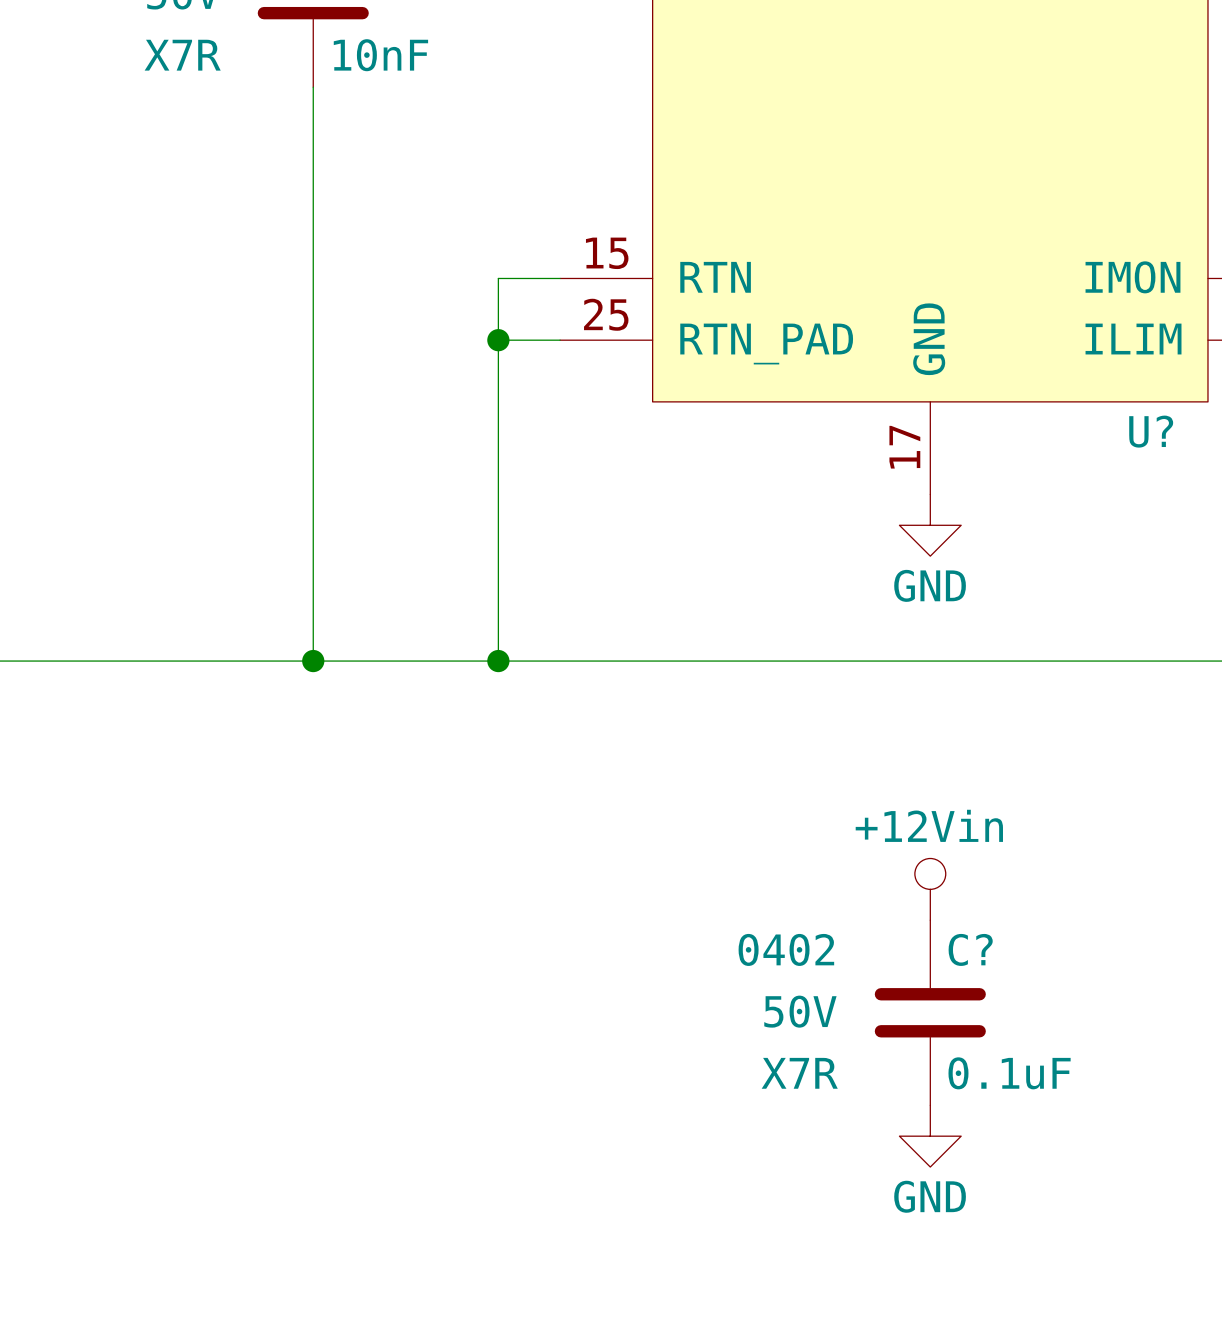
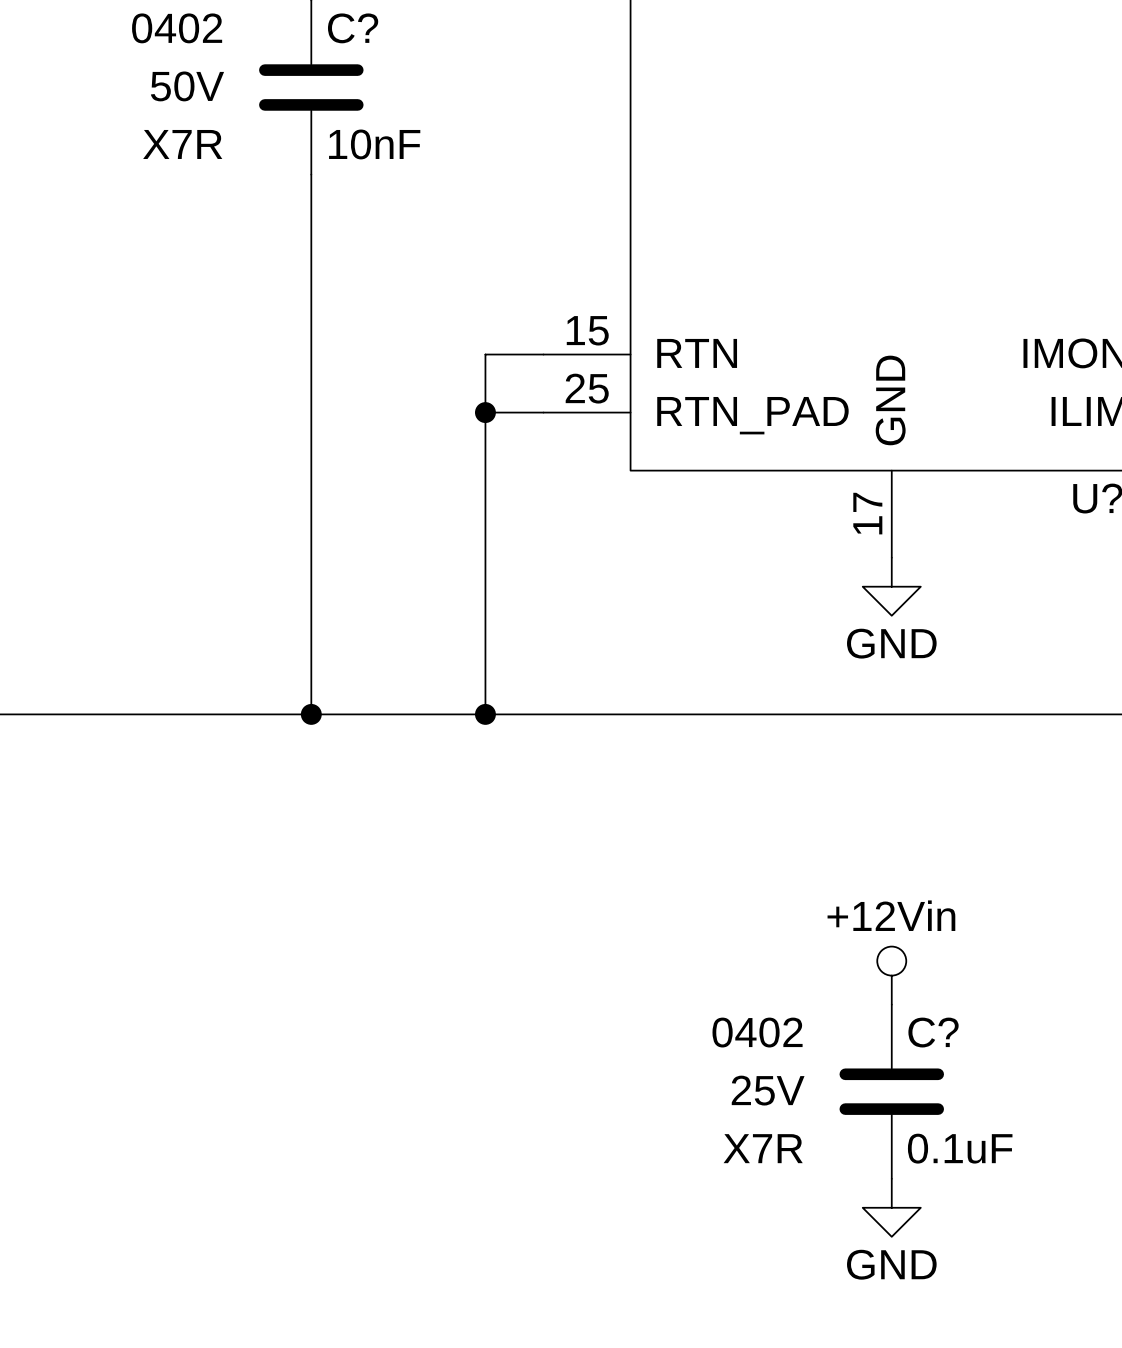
power symbol position: +12Vin (930, 889) -> +12Vin (891, 975)
C?: 0.1uF (930, 1012) -> none
C?: none -> 0.1uF (891, 1091)
power symbol position: GND (930, 1136) -> GND (891, 1207)

